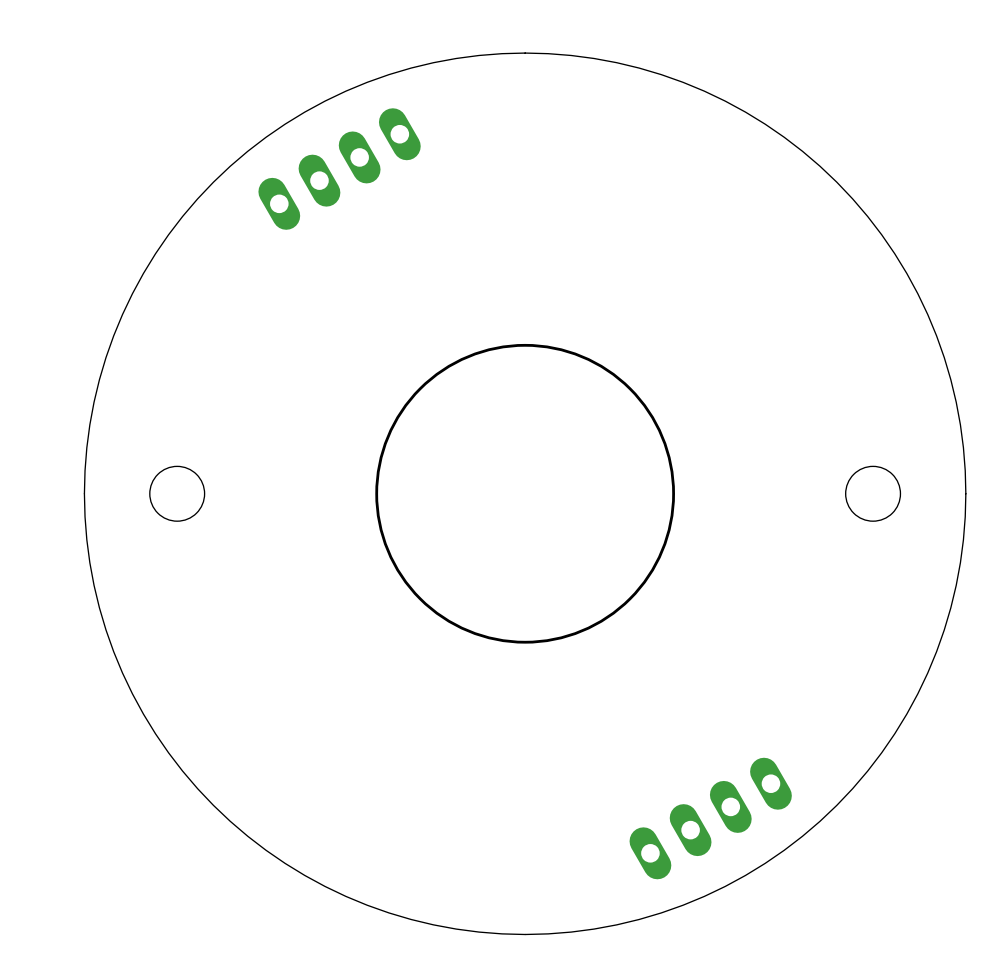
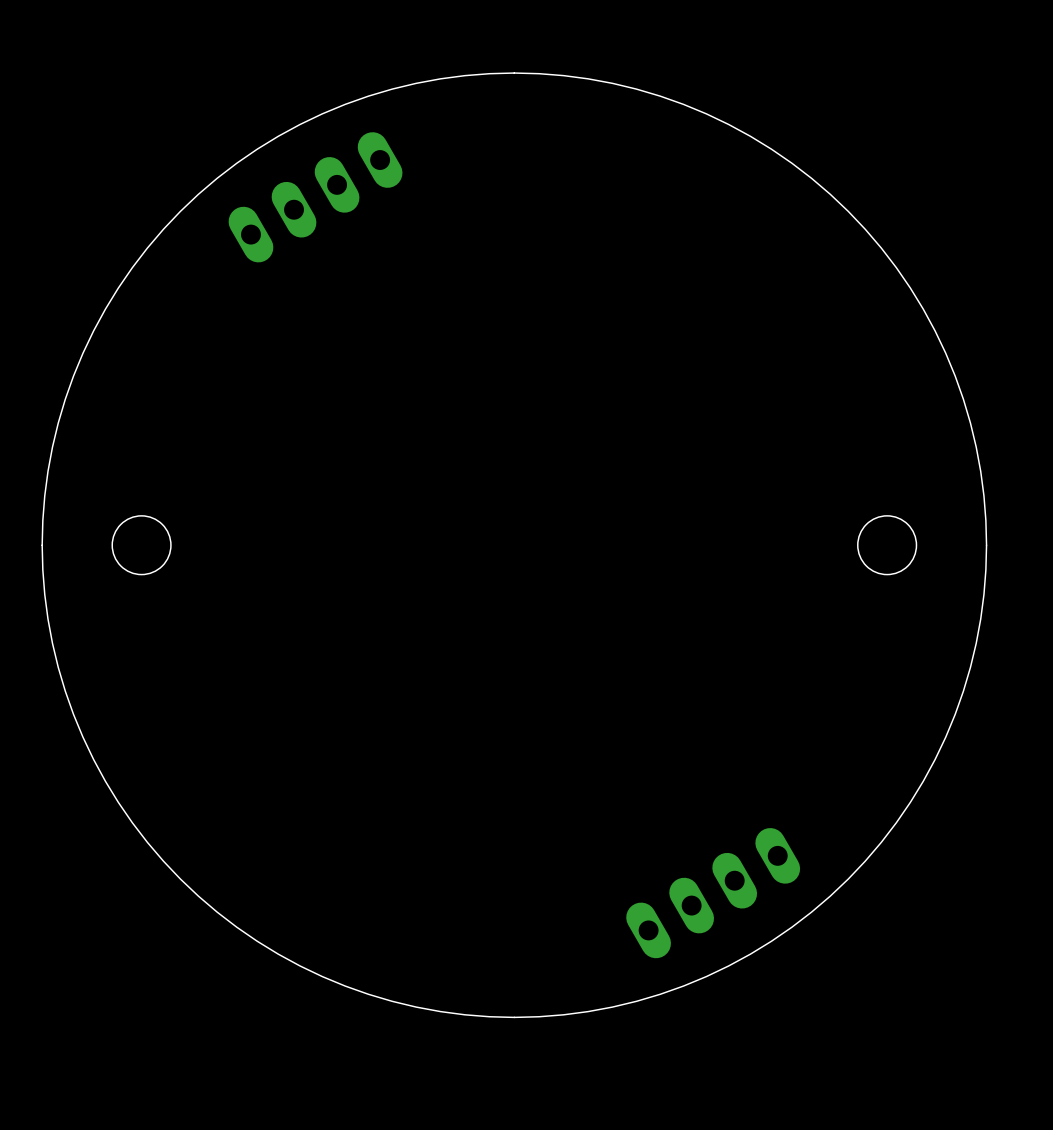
round board edge: [375, 343, 675, 644] -> none

